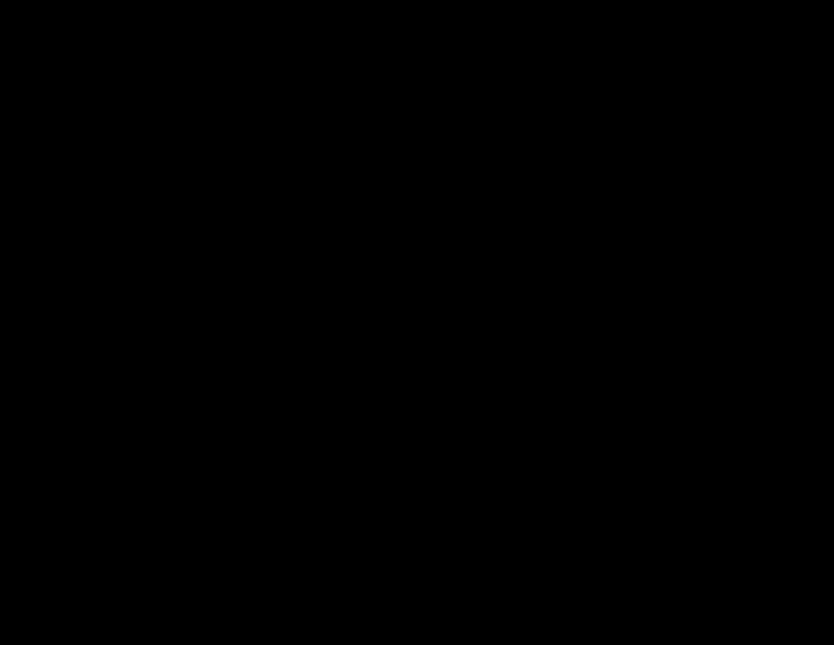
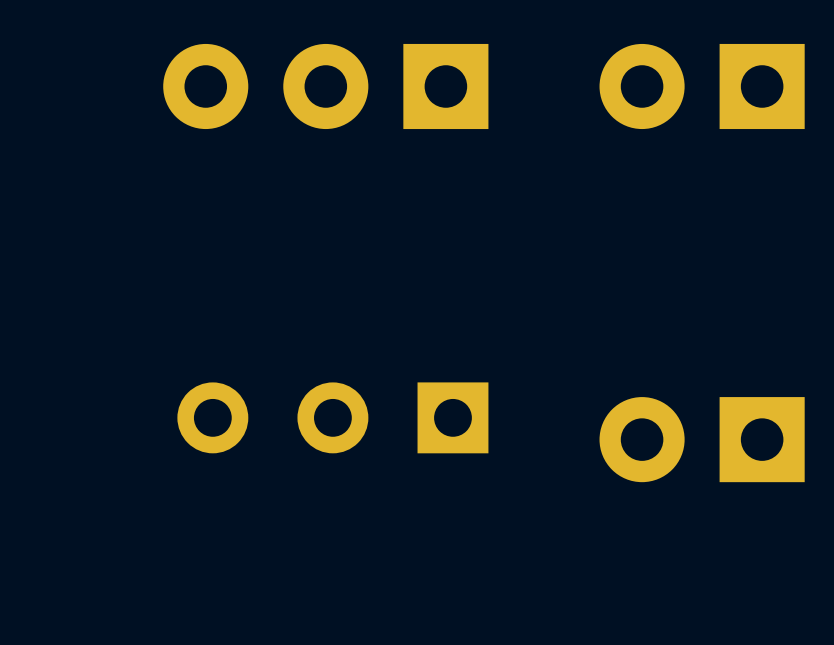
part: none -> (325, 86)
part: none -> (702, 86)
part: none -> (332, 417)
part: none -> (702, 439)

